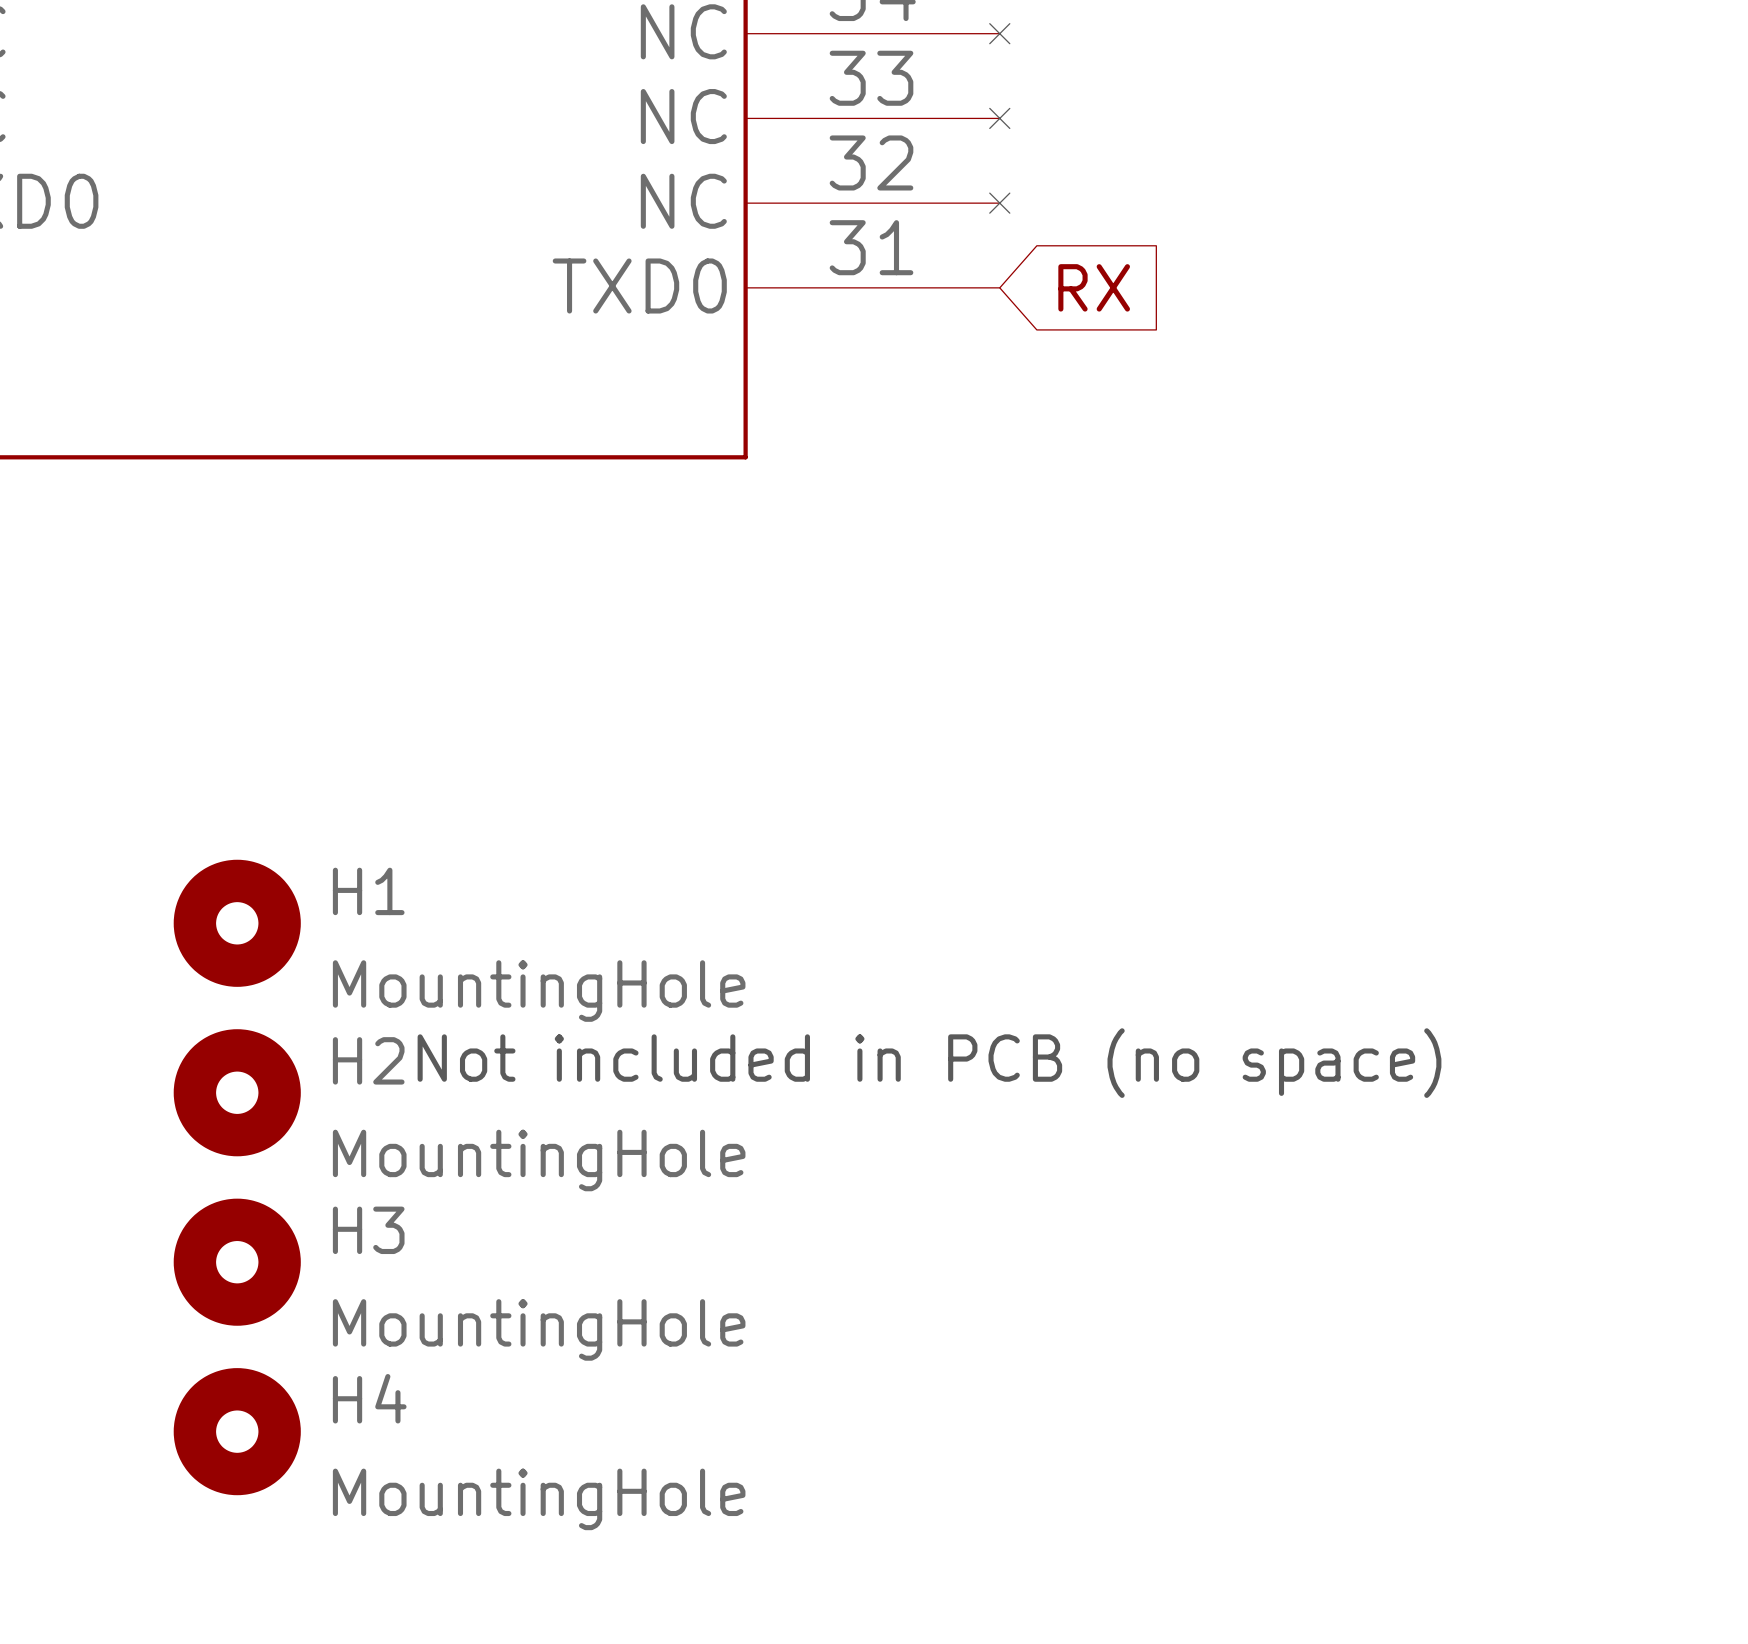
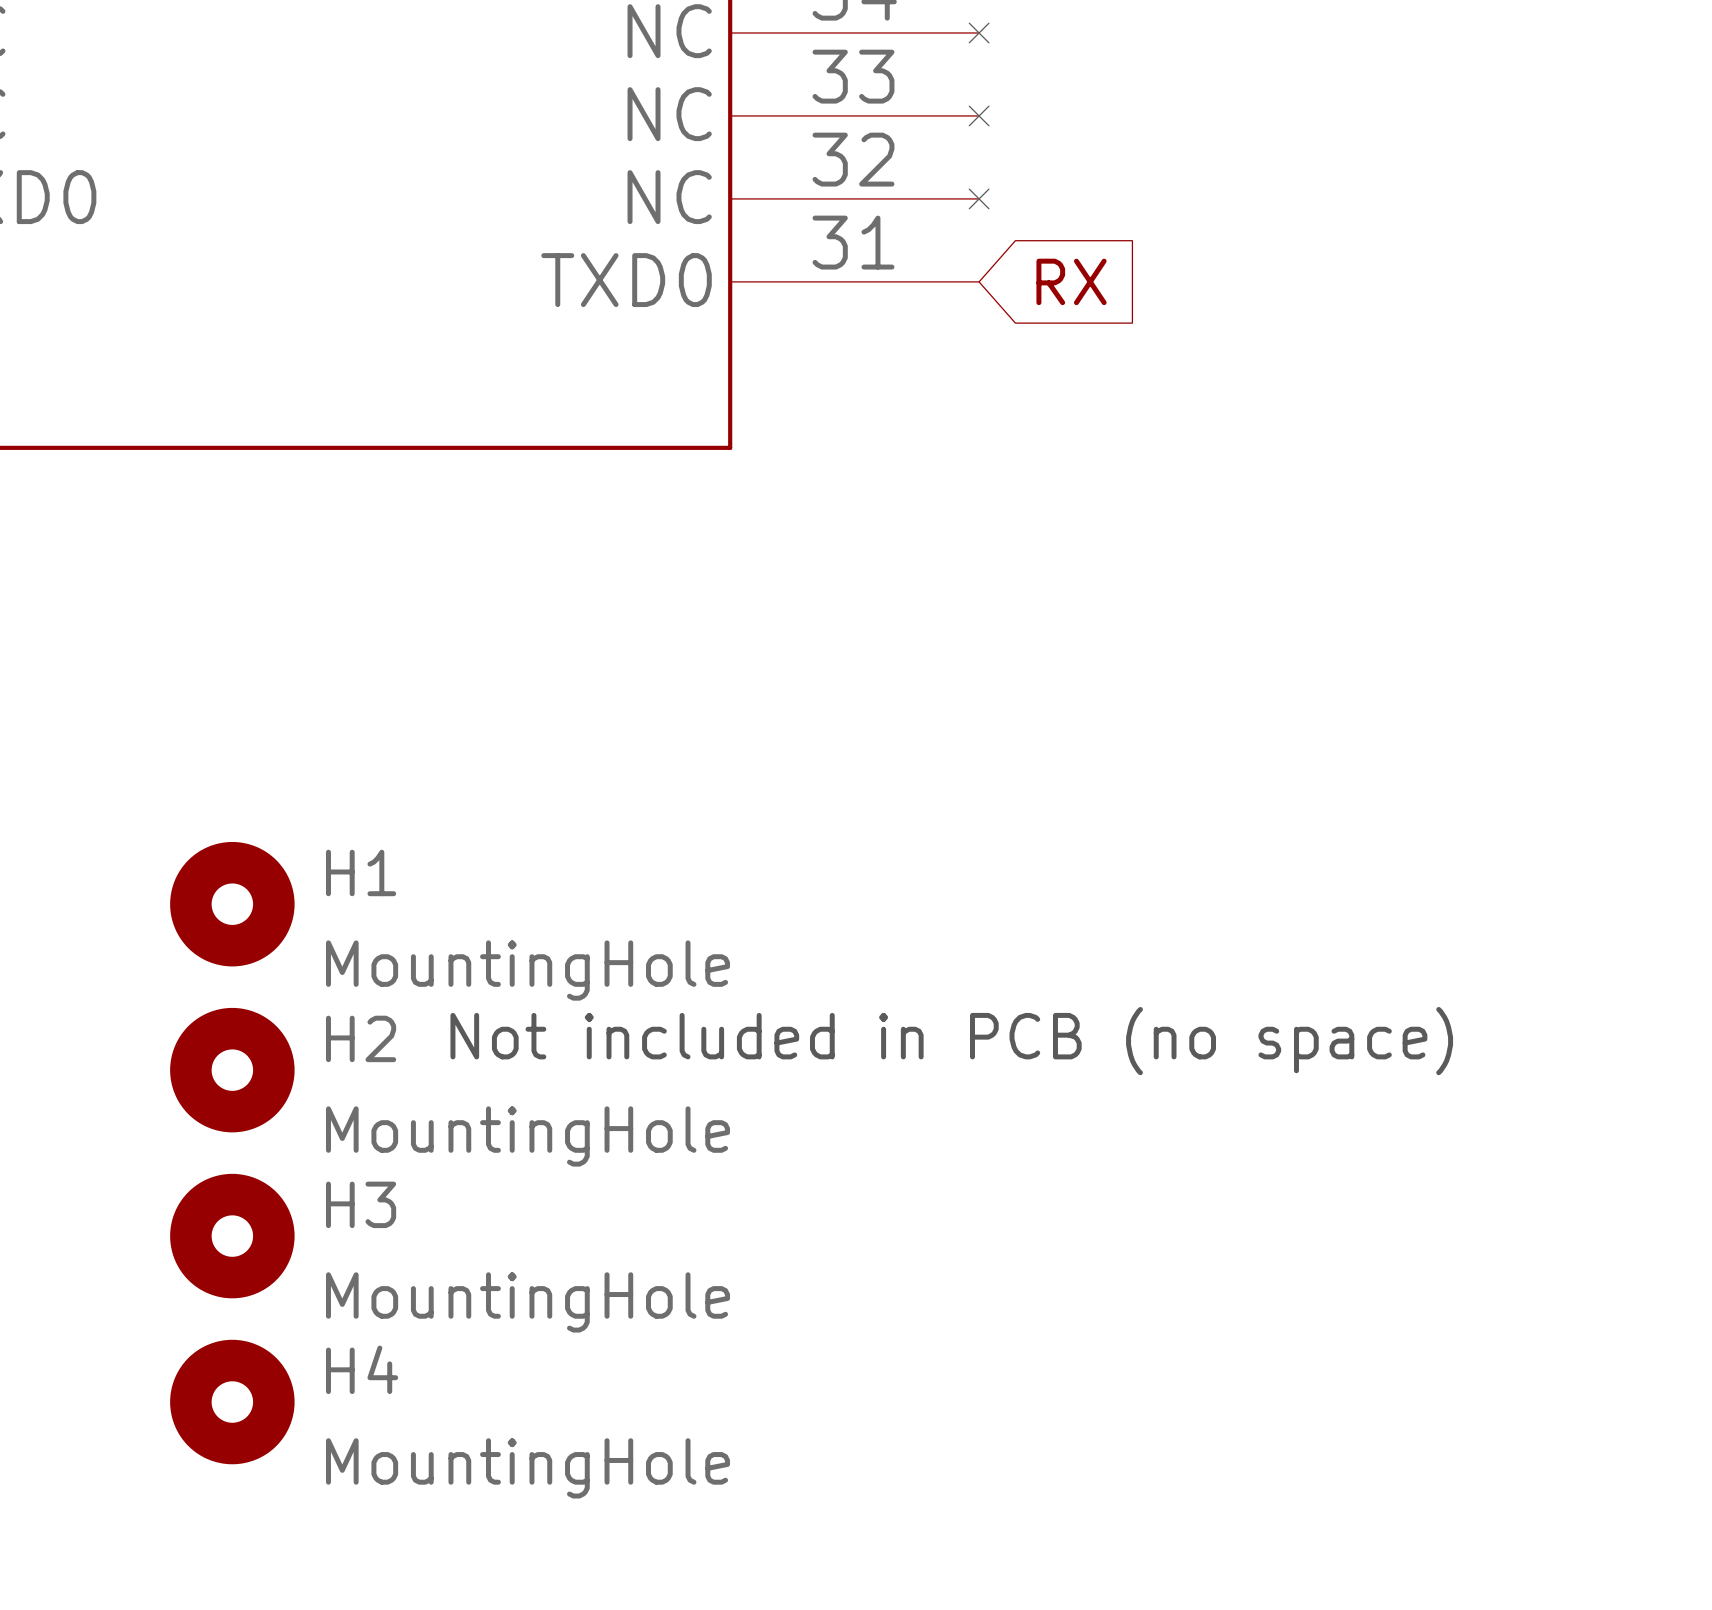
text position: Not included in PCB (no space) (929, 1063) -> Not included in PCB (no space) (951, 1041)

